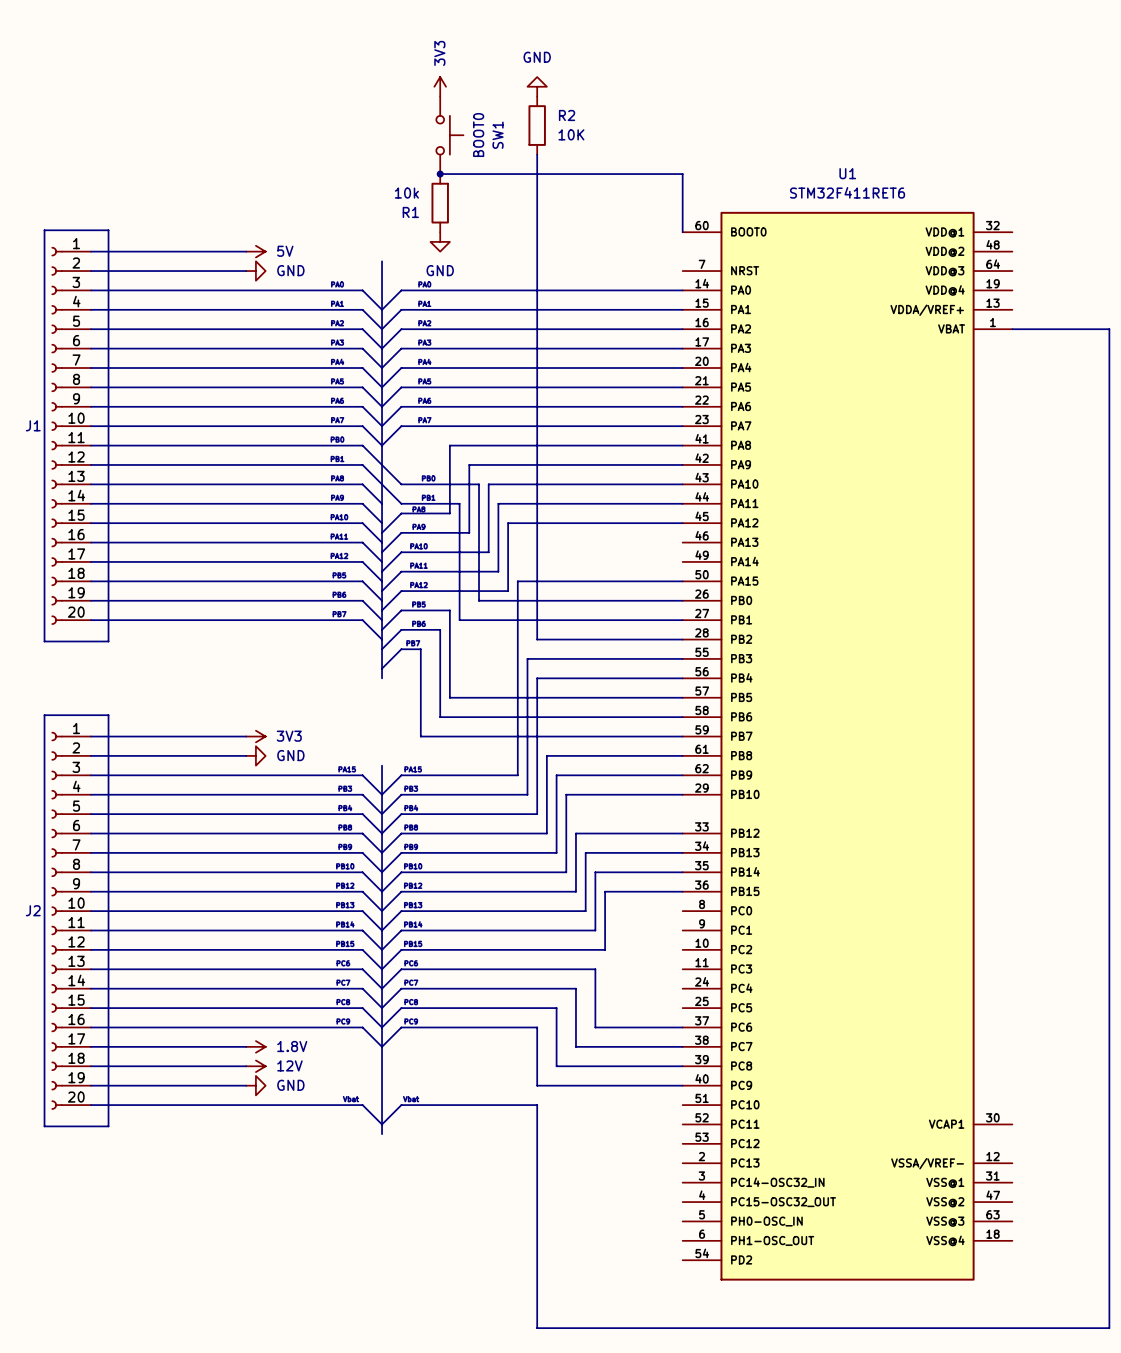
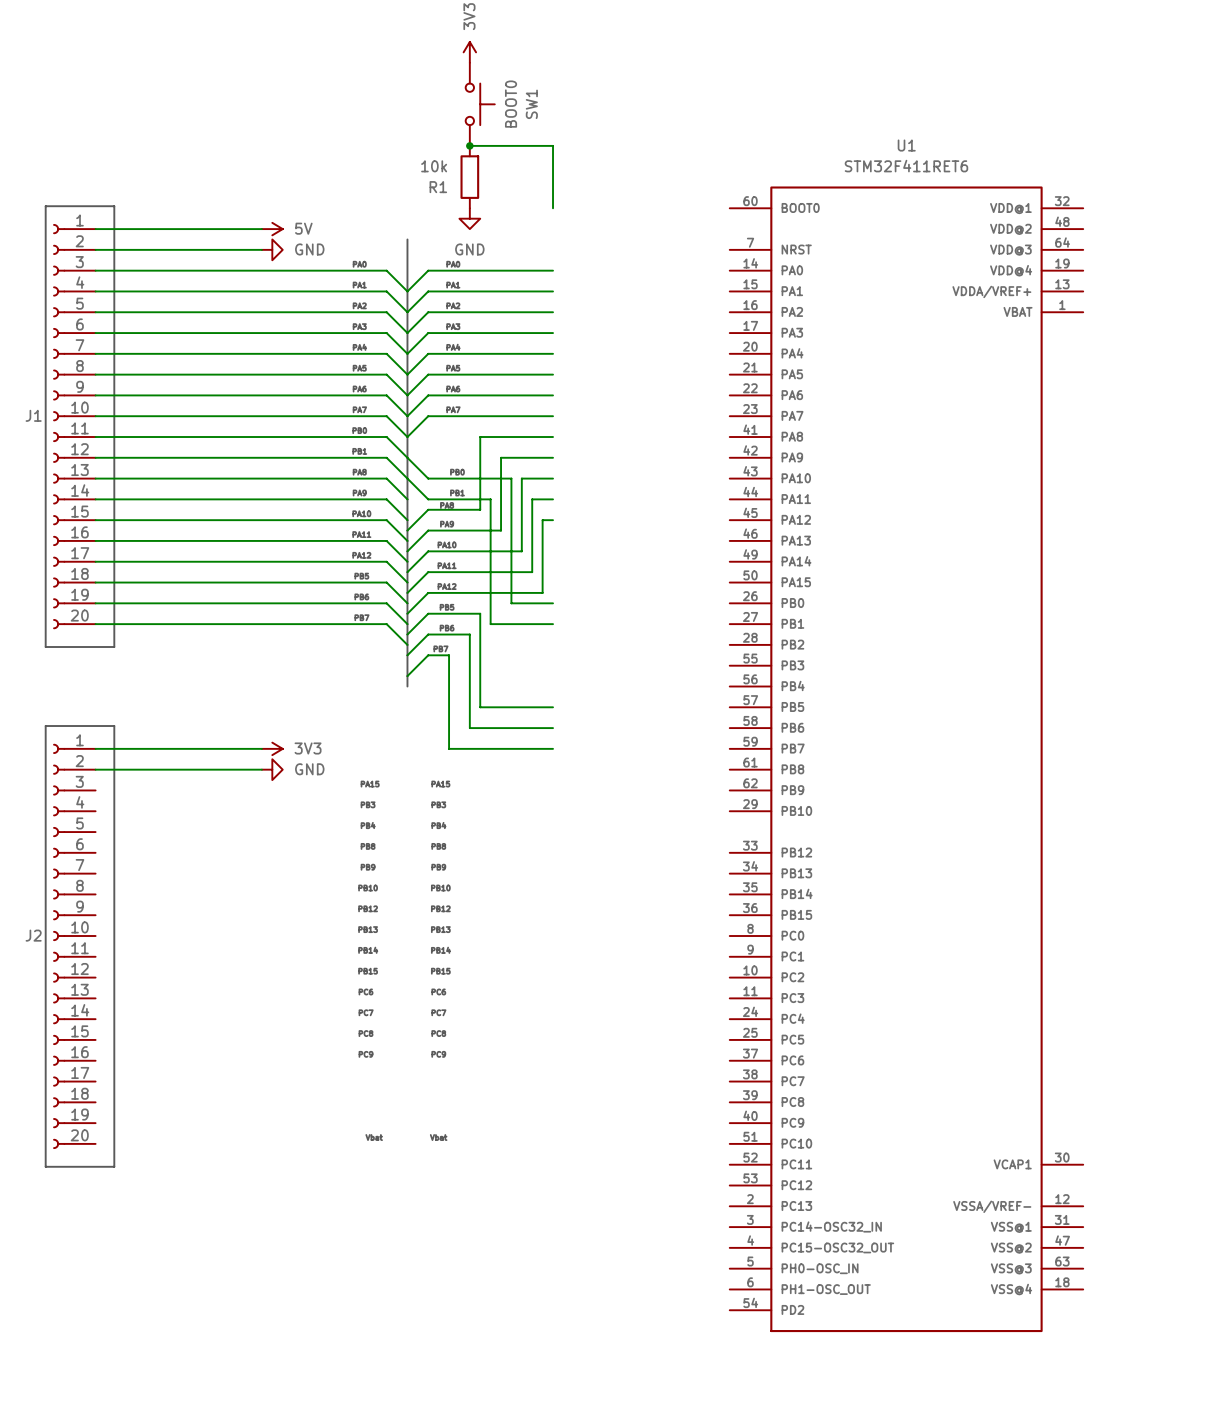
power symbol: GND (537, 86) -> none
R2: 10K (537, 125) -> none
wire: (537, 154) (537, 639) (682, 639) -> none
wire: (517, 174) (682, 174) (682, 232) -> (553, 145) (553, 208)
wire: (517, 290) (682, 290) -> none
wire: (517, 309) (682, 309) -> none
wire: (517, 329) (682, 329) -> none
wire: (1012, 329) (1109, 329) (1109, 1328) (537, 1328) (537, 1105) (401, 1105) (382, 1124) (362, 1105) (91, 1105) -> none
wire: (517, 348) (682, 348) -> none
wire: (517, 368) (682, 368) -> none
wire: (517, 387) (682, 387) -> none
wire: (517, 406) (682, 406) -> none
wire: (517, 426) (682, 426) -> none
wire: (517, 445) (682, 445) -> none
wire: (517, 464) (682, 464) -> none
wire: (517, 484) (682, 484) -> none
wire: (517, 503) (682, 503) -> none
wire: (517, 523) (682, 523) -> none
wire: (682, 581) (517, 581) (517, 775) (401, 775) (382, 794) (362, 775) (91, 775) -> none
wire: (517, 600) (682, 600) -> none
wire: (517, 620) (682, 620) -> none
wire: (682, 658) (527, 658) (527, 794) (401, 794) (382, 814) (362, 794) (91, 794) -> none
wire: (682, 678) (537, 678) (537, 814) (401, 814) (382, 833) (362, 814) (91, 814) -> none
wire: (517, 697) (682, 697) -> none
wire: (517, 717) (682, 717) -> none
wire: (517, 736) (682, 736) -> none
wire: (682, 755) (546, 755) (546, 833) (401, 833) (382, 852) (362, 833) (91, 833) -> none
bus: (382, 765) (382, 1134) -> none
wire: (682, 775) (556, 775) (556, 852) (401, 852) (382, 872) (362, 852) (91, 852) -> none
wire: (682, 794) (566, 794) (566, 872) (401, 872) (382, 891) (362, 872) (91, 872) -> none
wire: (682, 833) (575, 833) (575, 891) (401, 891) (382, 911) (362, 891) (91, 891) -> none
wire: (682, 852) (585, 852) (585, 911) (401, 911) (382, 930) (362, 911) (91, 911) -> none
wire: (682, 872) (595, 872) (595, 930) (401, 930) (382, 949) (362, 930) (91, 930) -> none
wire: (682, 891) (605, 891) (605, 949) (401, 949) (382, 969) (362, 949) (91, 949) -> none
wire: (91, 969) (362, 969) (382, 988) (401, 969) (595, 969) (595, 1027) (682, 1027) -> none
wire: (91, 988) (362, 988) (382, 1008) (401, 988) (575, 988) (575, 1046) (682, 1046) -> none
wire: (91, 1008) (362, 1008) (382, 1027) (401, 1008) (556, 1008) (556, 1066) (682, 1066) -> none
wire: (91, 1027) (362, 1027) (382, 1046) (401, 1027) (537, 1027) (537, 1085) (682, 1085) -> none
wire: (91, 1046) (246, 1046) -> none
power symbol: 1.8V (255, 1046) -> none
wire: (91, 1066) (246, 1066) -> none
power symbol: 12V (255, 1066) -> none
wire: (91, 1085) (246, 1085) -> none
power symbol: GND (255, 1085) -> none

